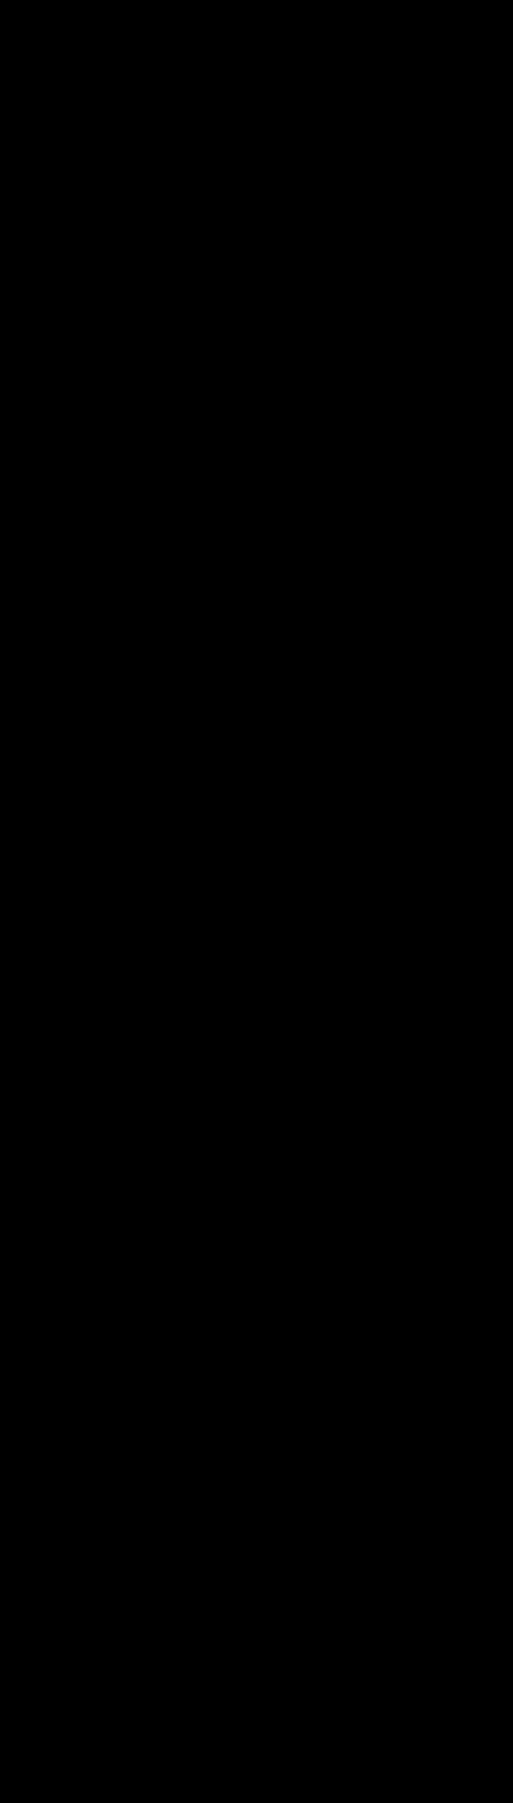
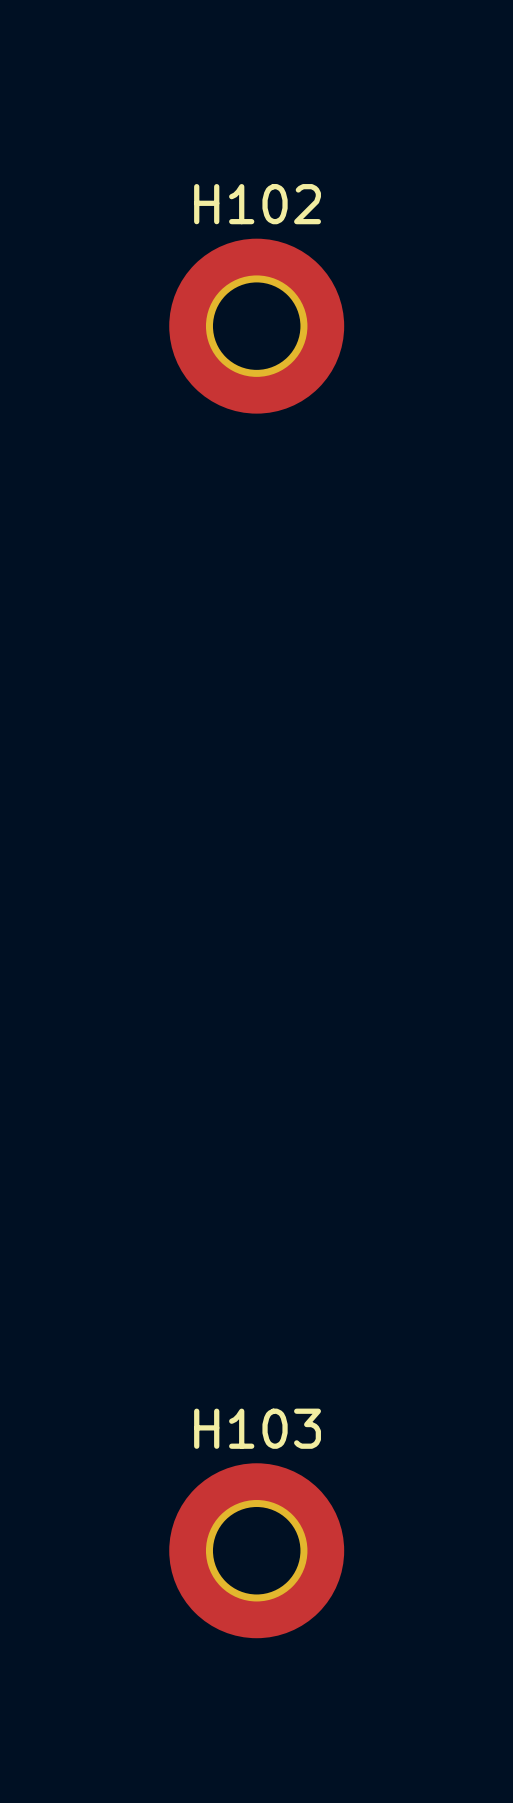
H102: none -> (256, 326)
H103: none -> (256, 1550)

